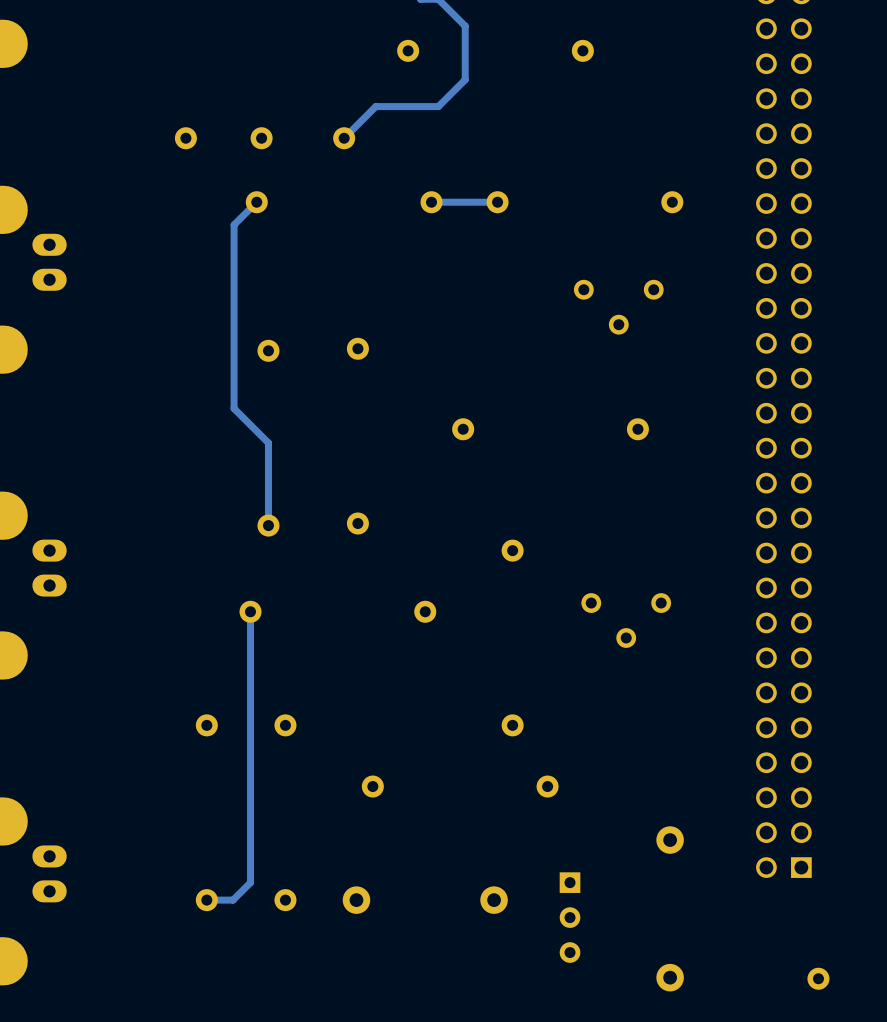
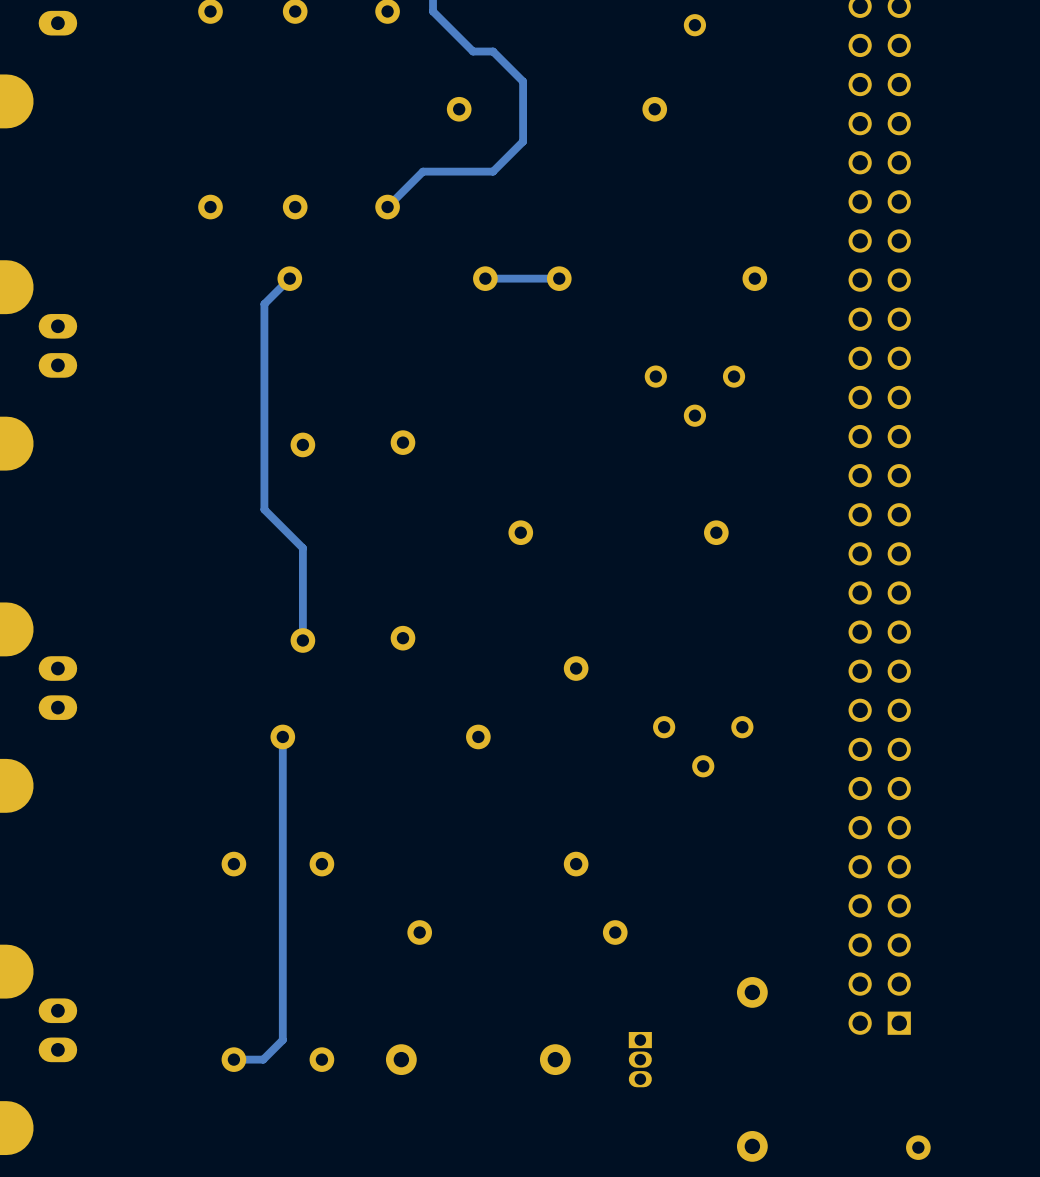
part: none -> (640, 1059)
part: (570, 917) -> none

